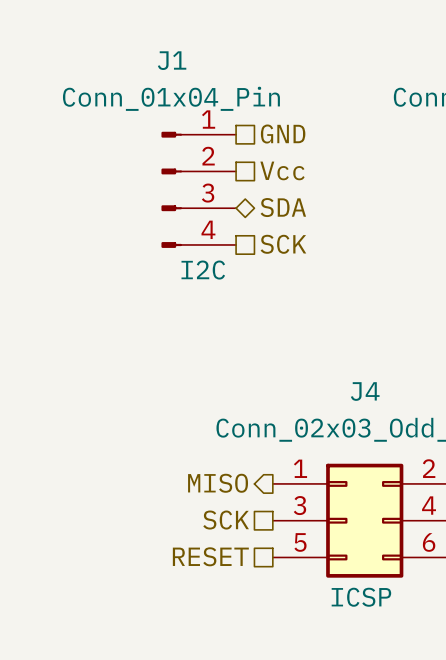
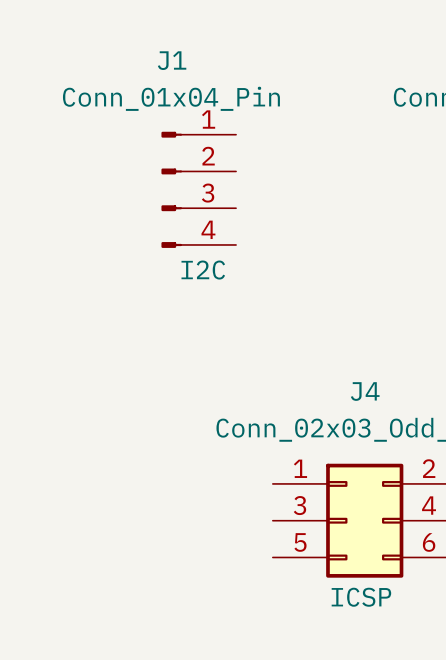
hierarchical label: GND (283, 134) -> none
hierarchical label: Vcc (282, 170) -> none
hierarchical label: SDA (283, 207) -> none
hierarchical label: SCK (283, 244) -> none
hierarchical label: MISO (218, 483) -> none
hierarchical label: SCK (226, 520) -> none
hierarchical label: RESET (210, 556) -> none

